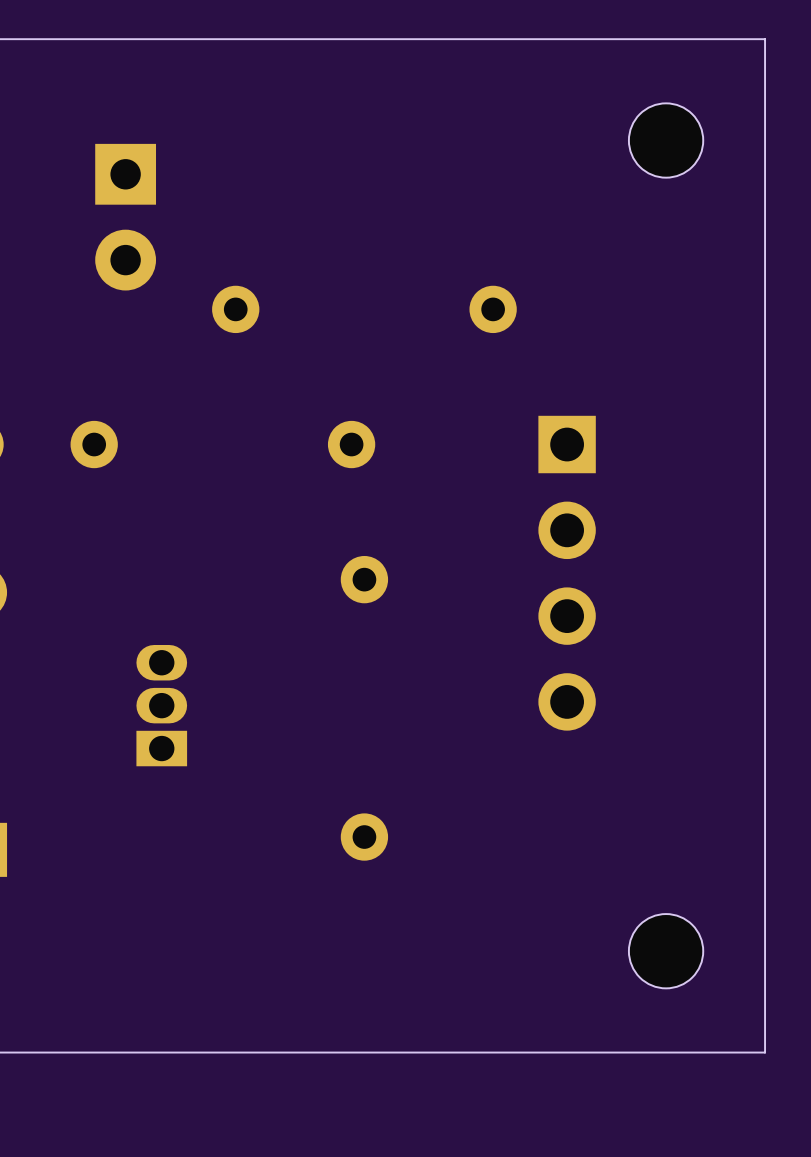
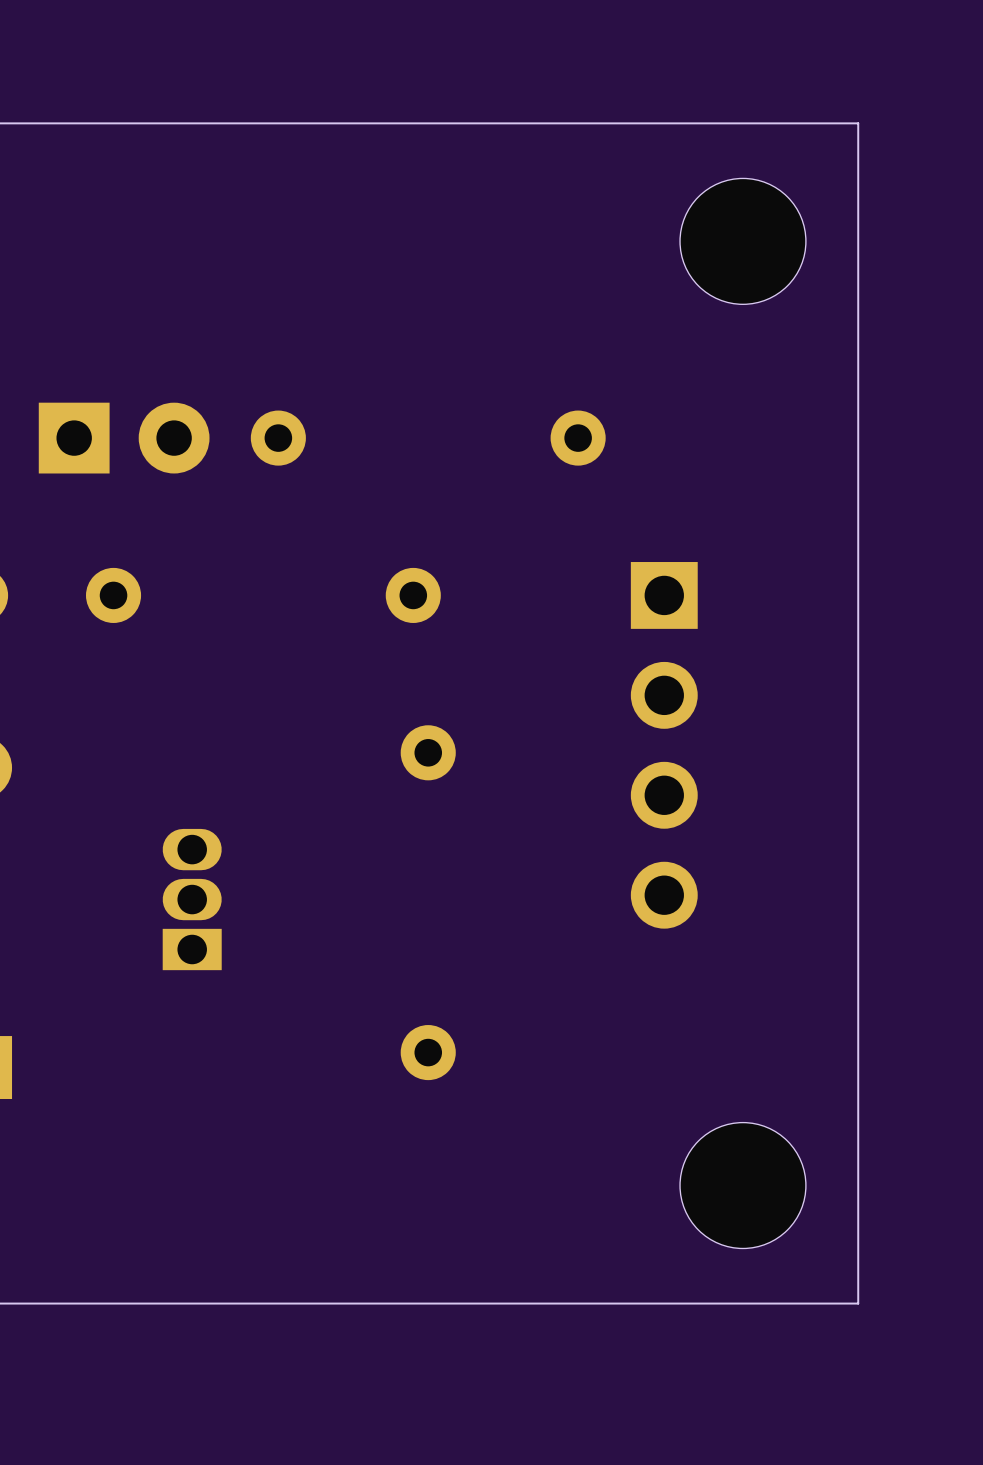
board edge: (733, 39) (765, 39) (765, 1052) (733, 1052) -> (858, 123) (858, 1303)
part footprint: [628, 103, 704, 178] -> [680, 178, 806, 305]
part rotation: 0° (125, 217) -> 90° counterclockwise (124, 438)
part position: (125, 217) -> (124, 438)
part footprint: [628, 914, 704, 989] -> [680, 1122, 806, 1249]

